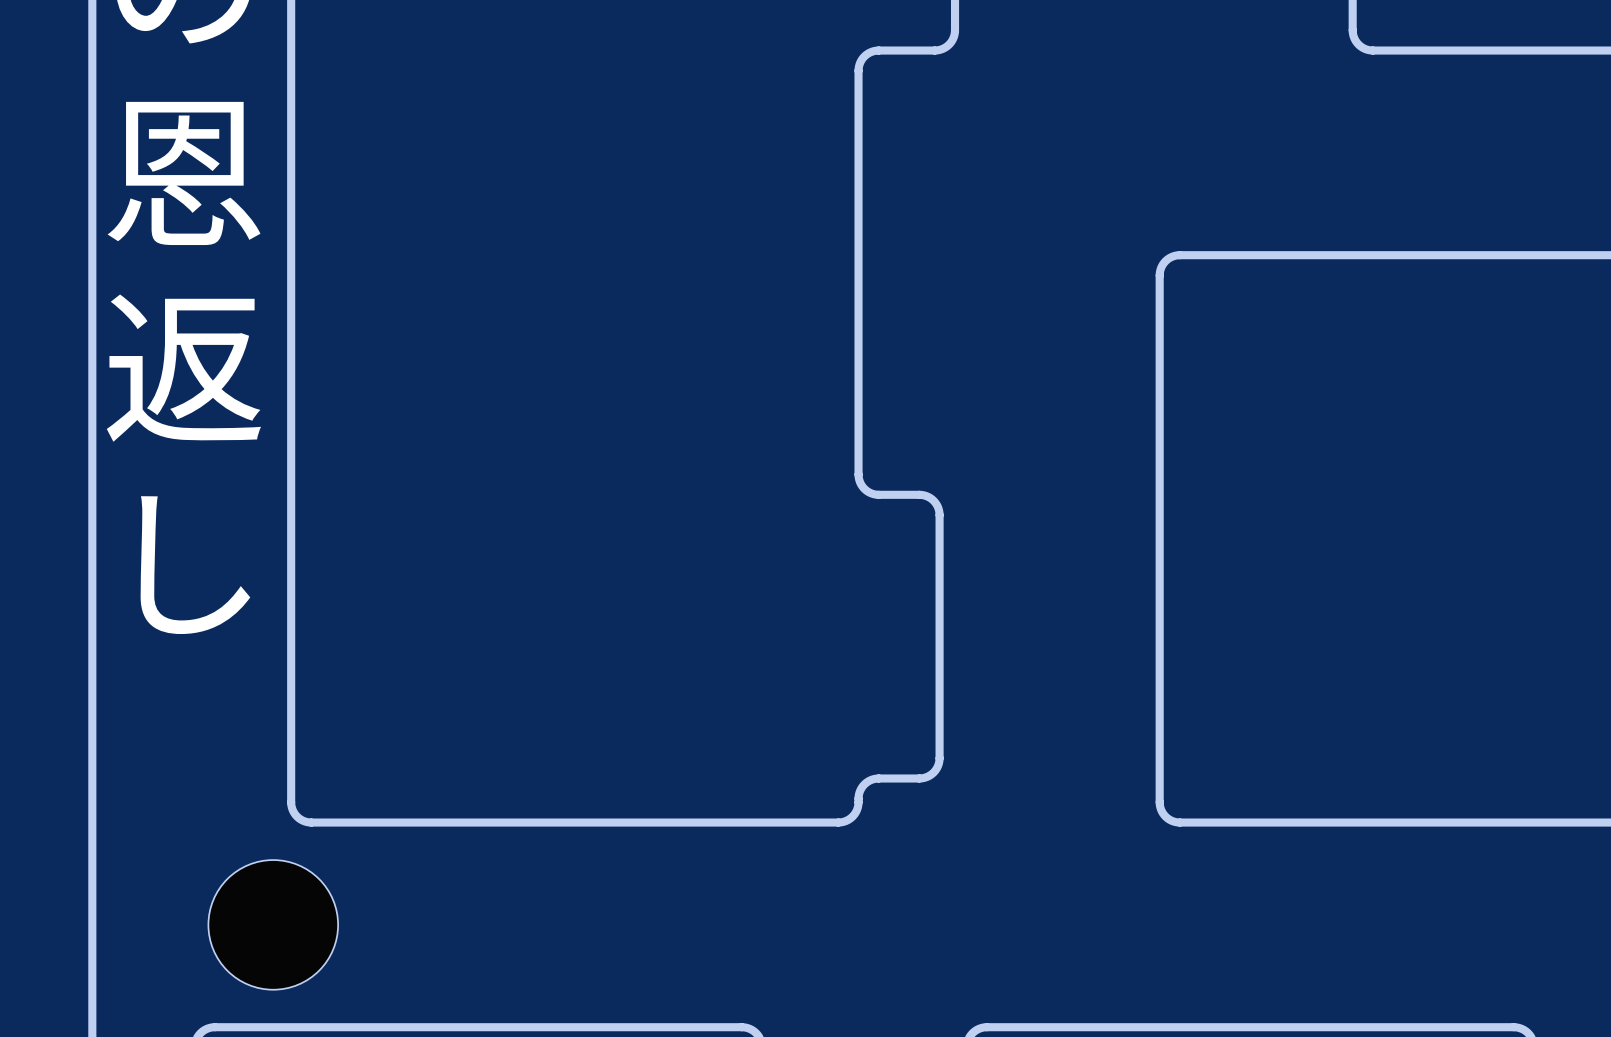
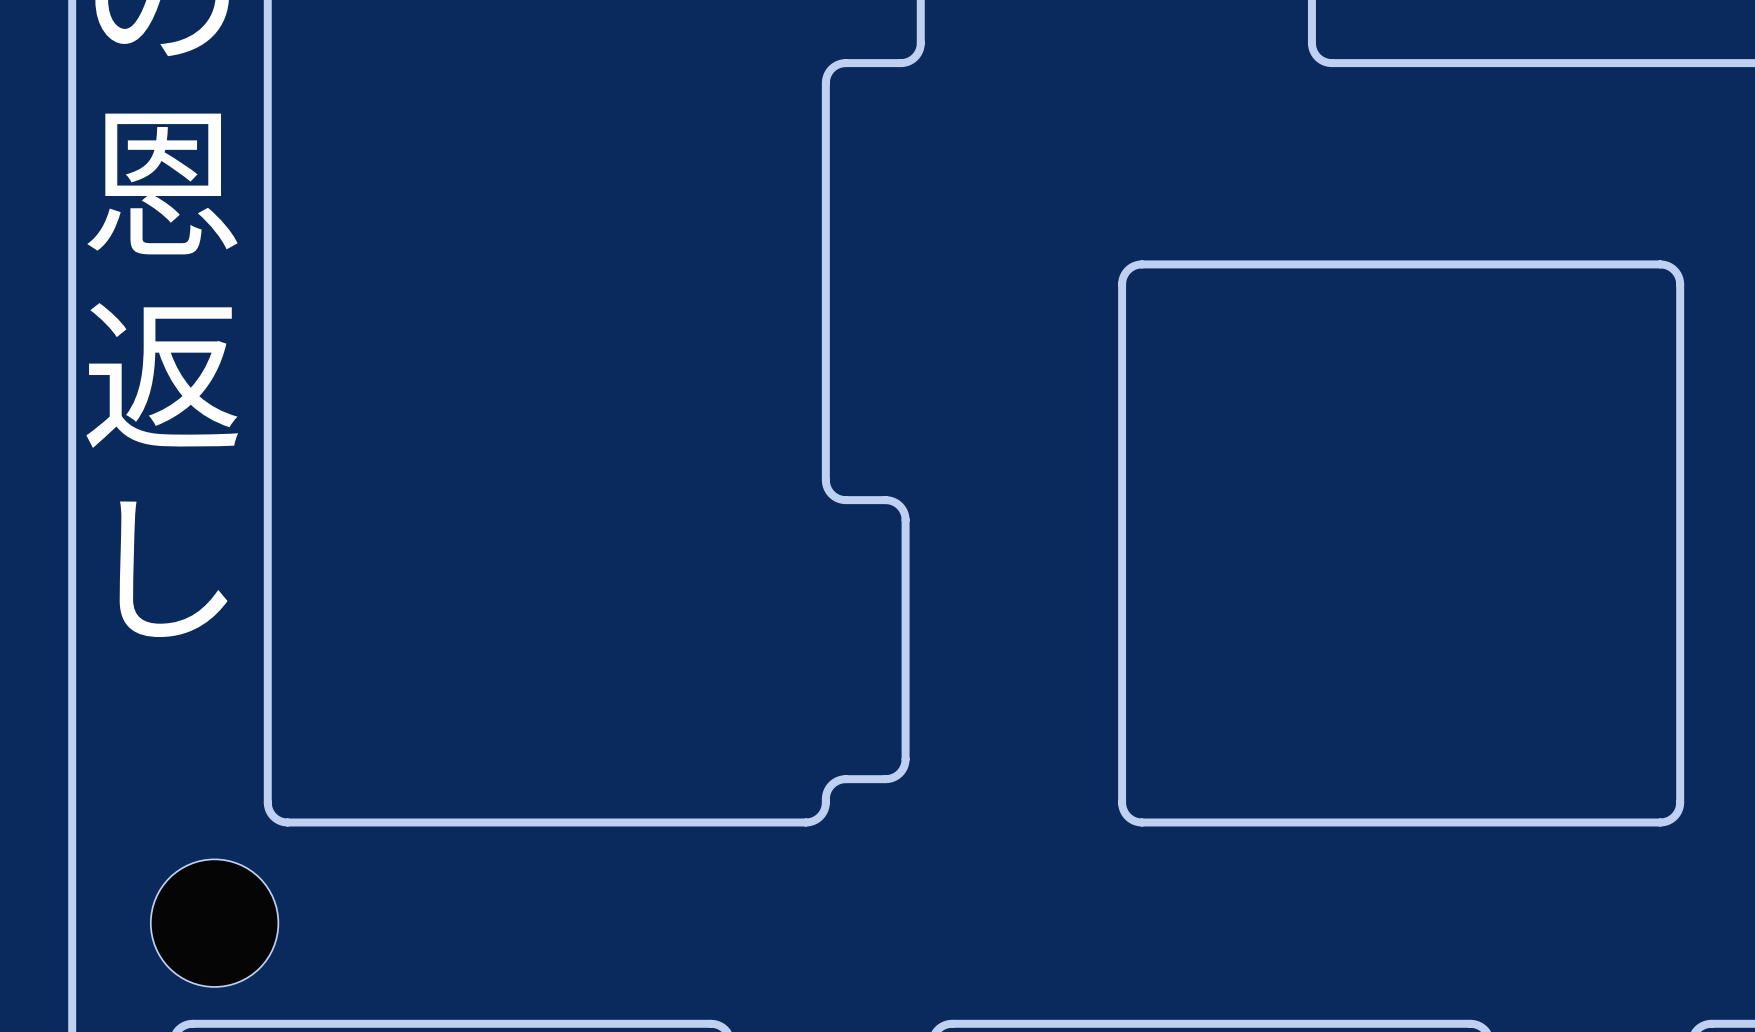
part position: (273, 924) -> (214, 923)

